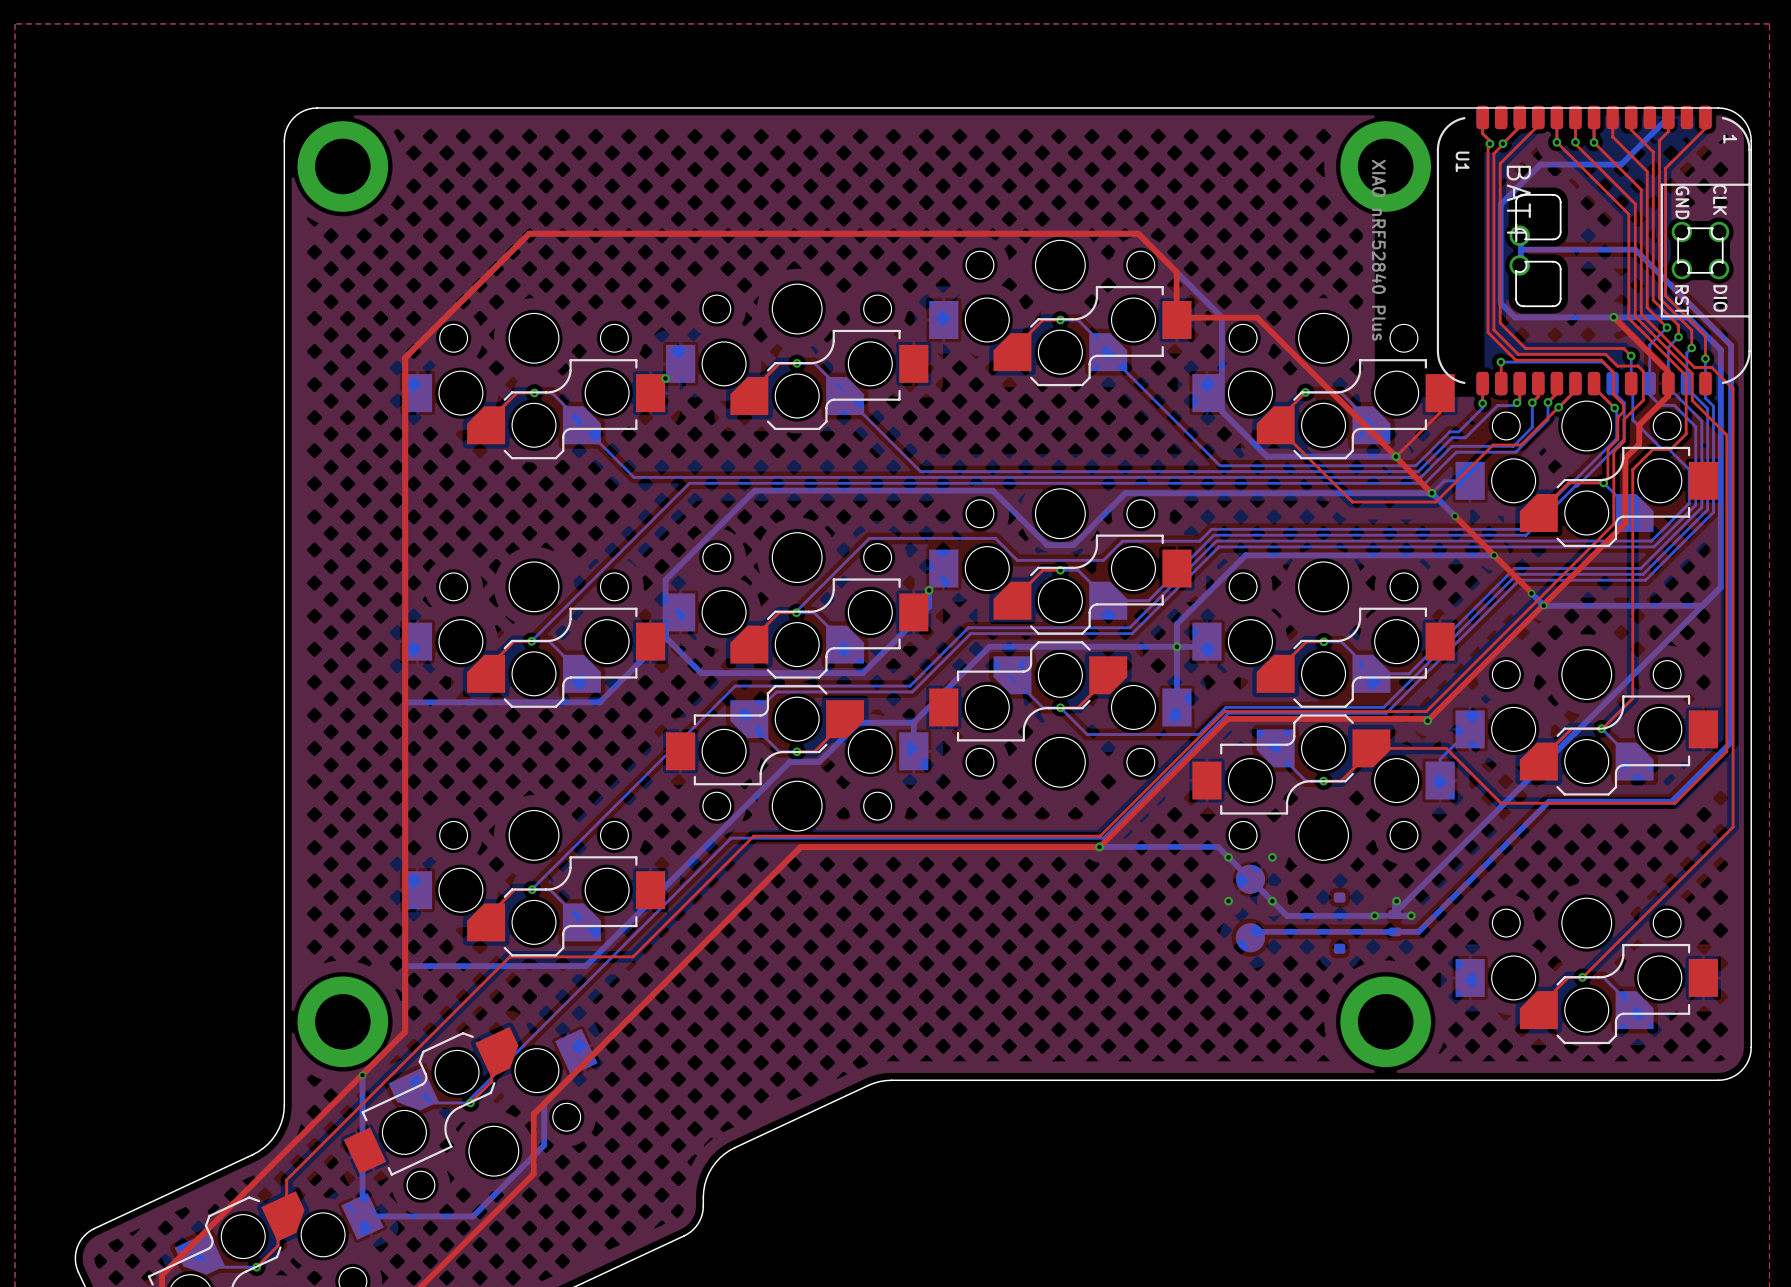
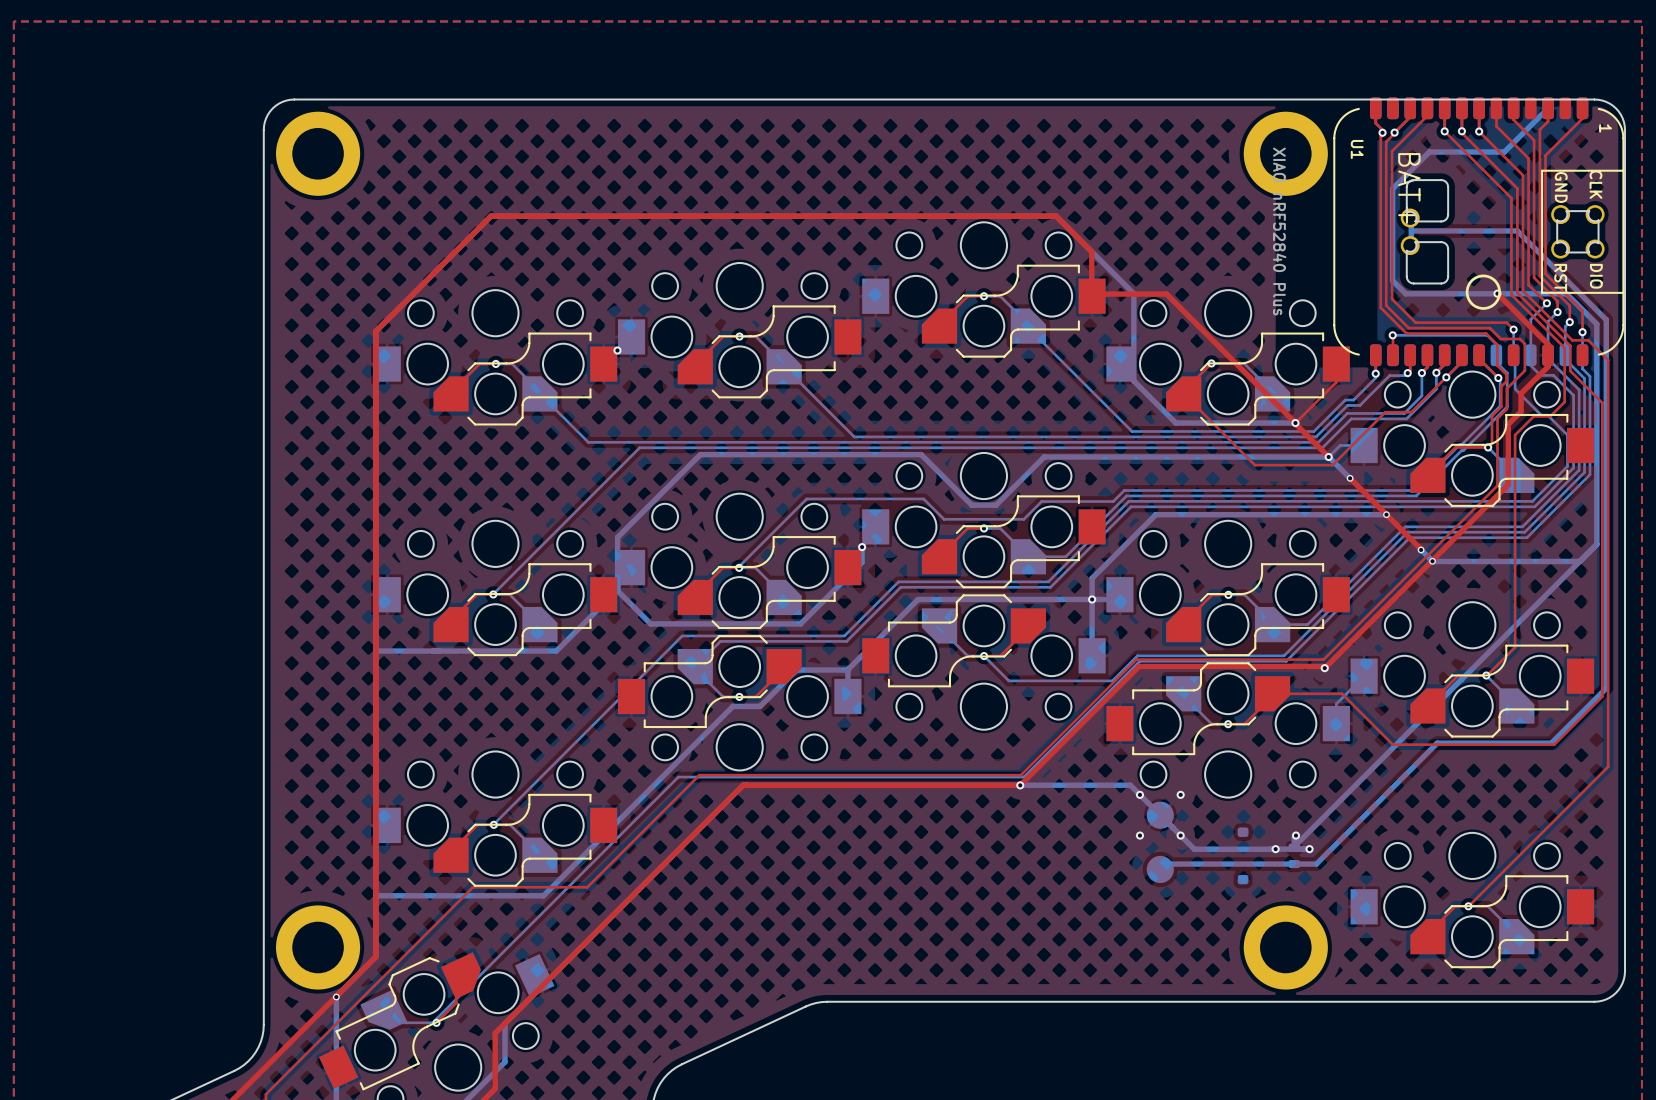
drawing: none -> [1465, 274, 1502, 310]

